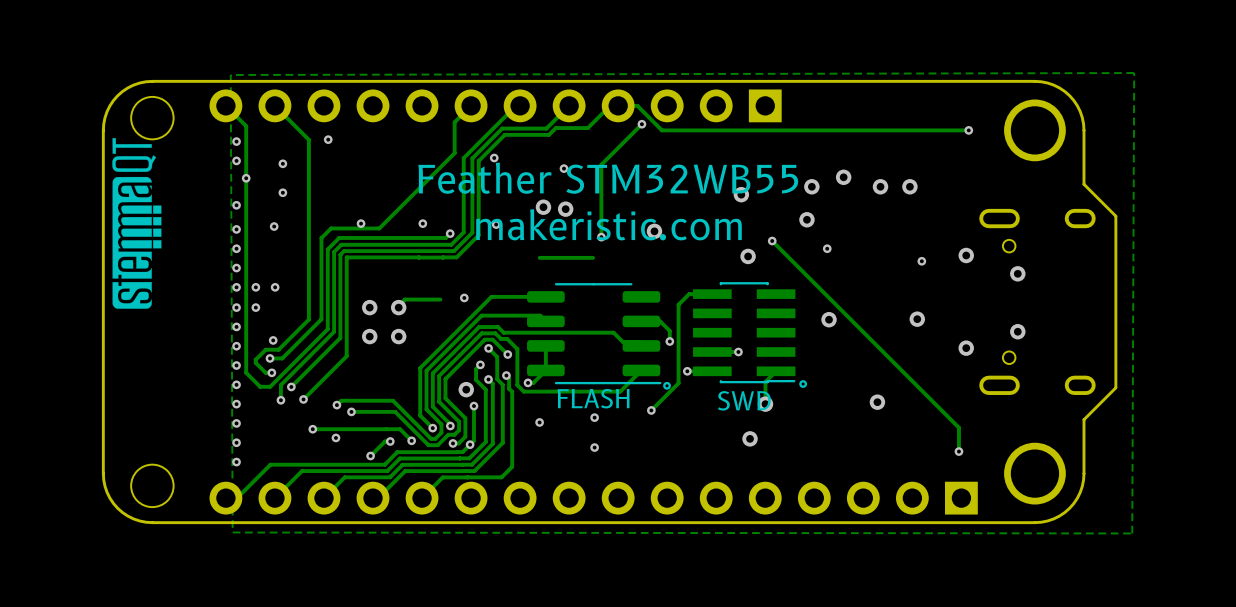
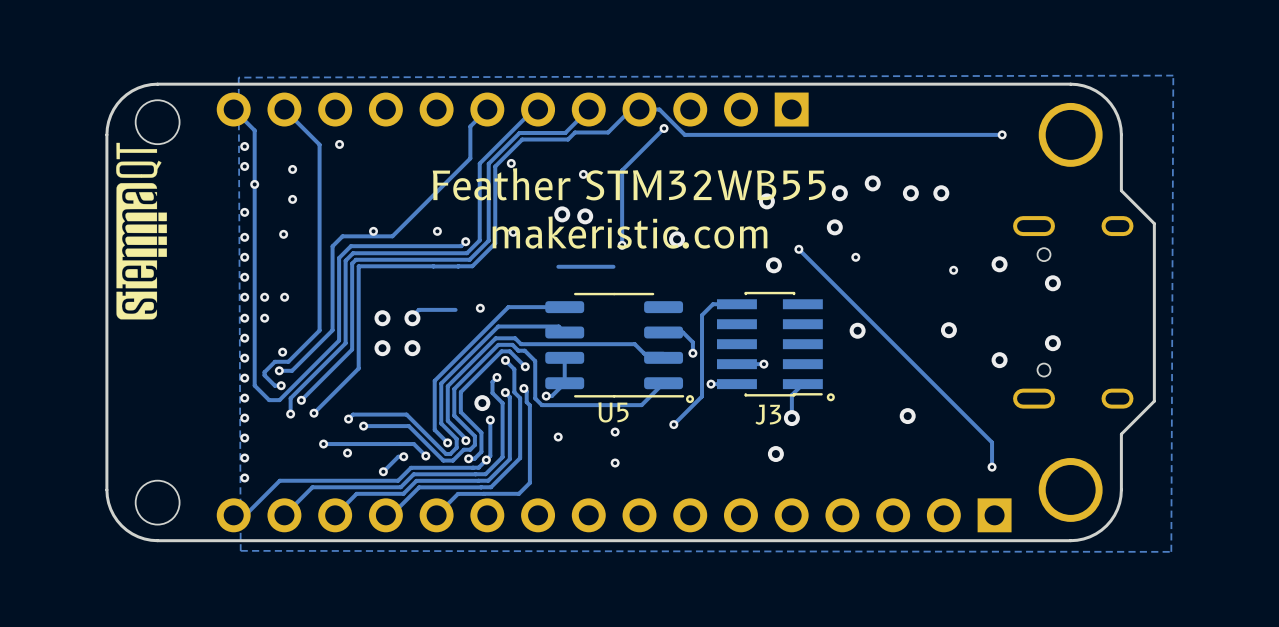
FLASH name: FLASH (593, 398) -> U5 (613, 412)
SWD name: SWD (744, 400) -> J3 (768, 414)

